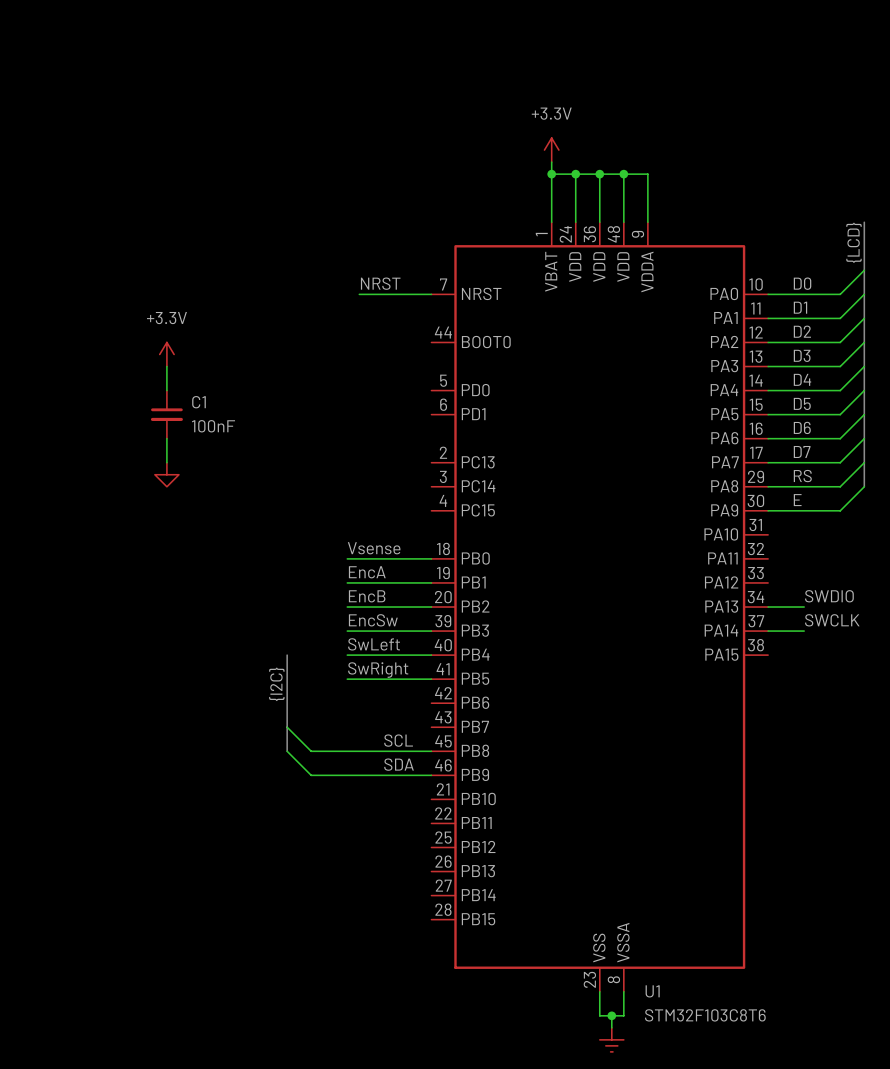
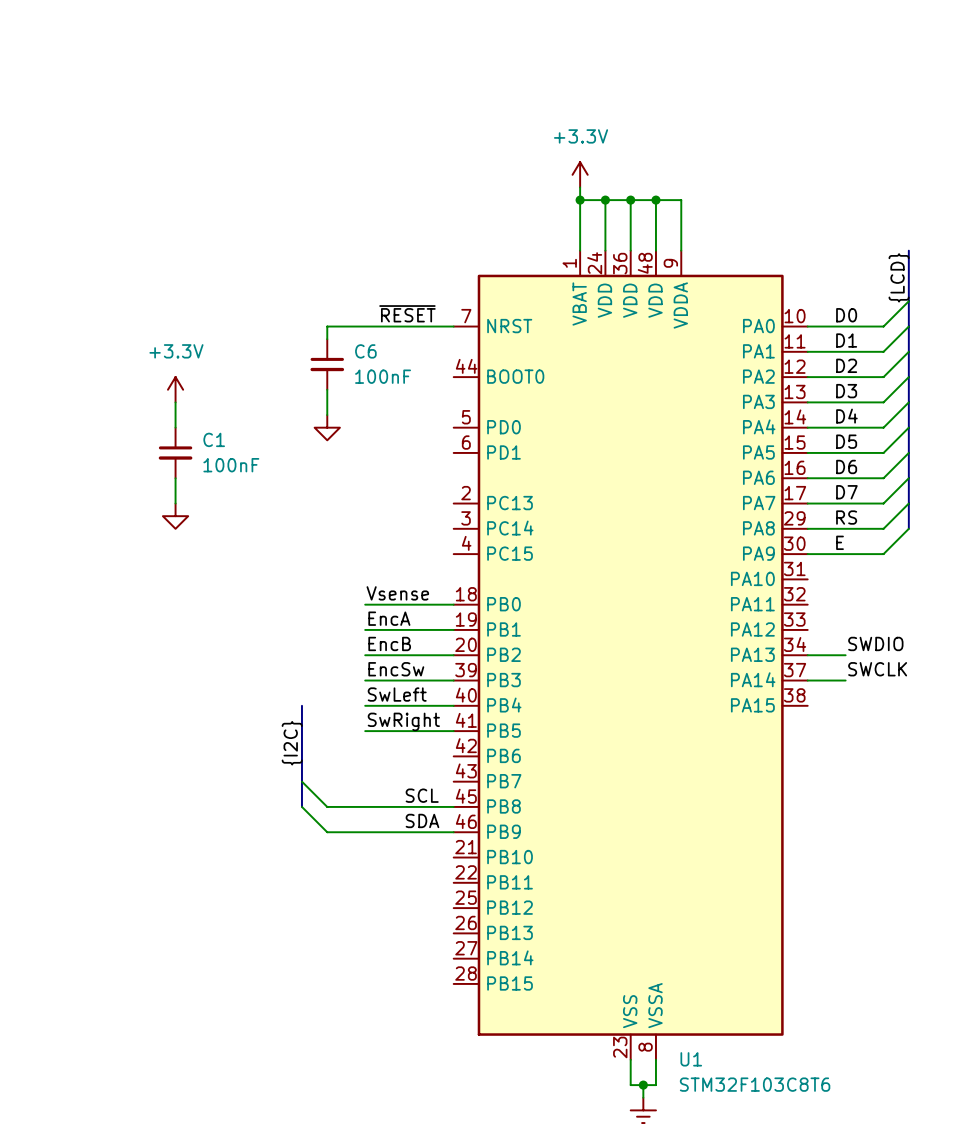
label: NRST (380, 283) -> ~{RESET} (407, 313)
wire: none -> (377, 326) (327, 326) (327, 339)
C6: none -> 100nF (327, 364)
wire: none -> (327, 389) (327, 415)
power symbol: none -> (327, 427)

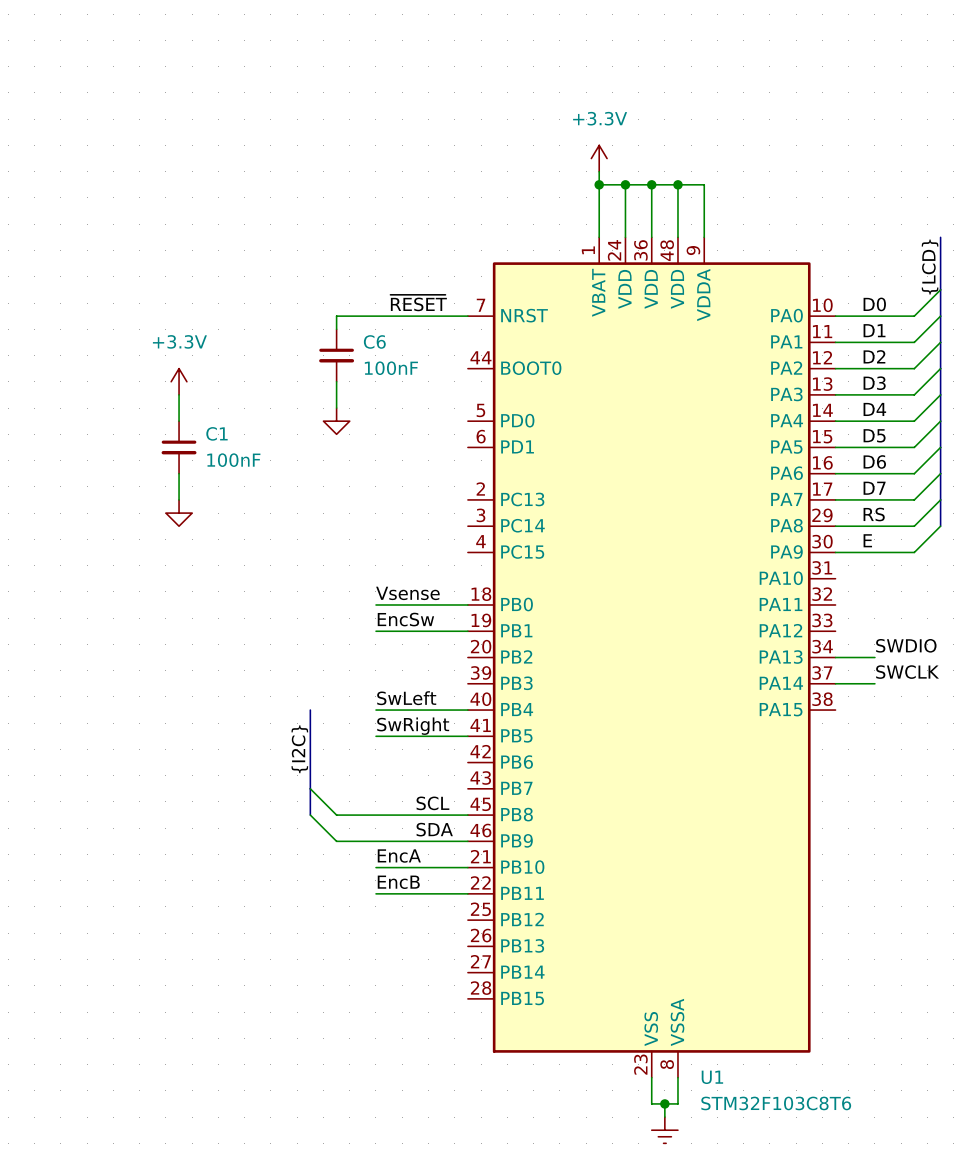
label: EncA (389, 618) -> EncSw (405, 619)
label position: EncB (389, 643) -> EncB (398, 882)
wire: (365, 655) (453, 655) -> (375, 893) (467, 893)
label: EncSw (396, 669) -> none
wire: (365, 680) (453, 680) -> (375, 867) (467, 867)
label: none -> EncA (399, 856)

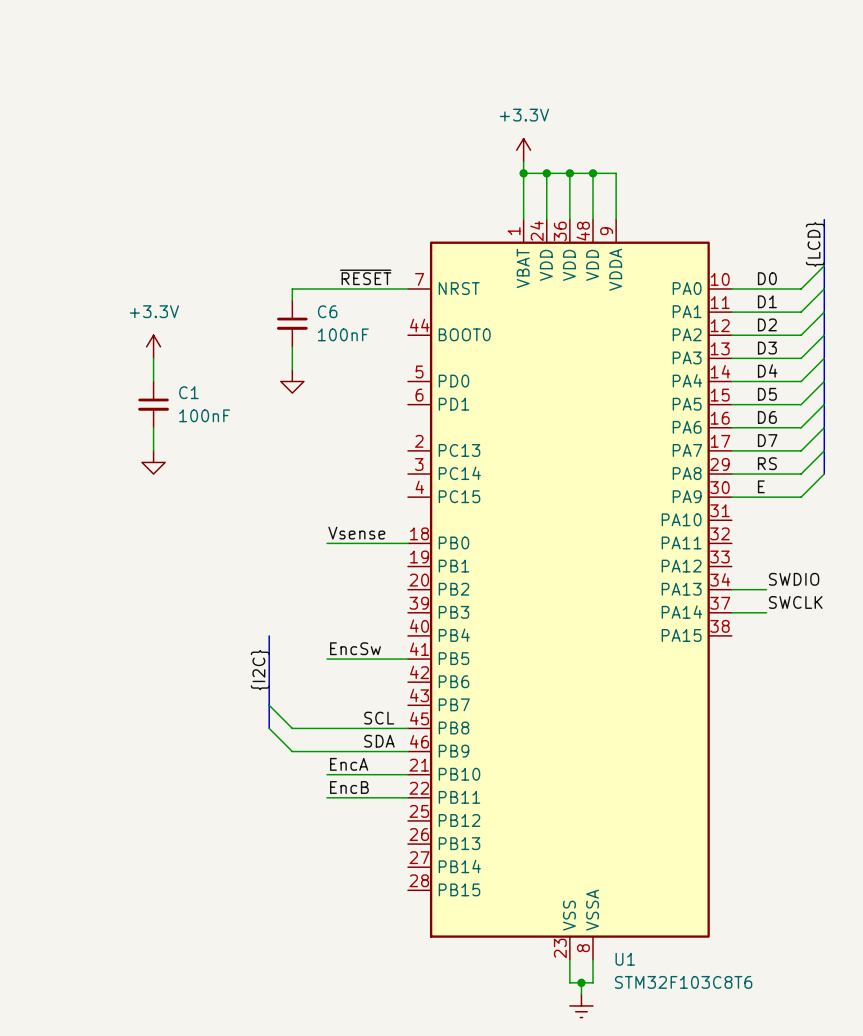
label: EncSw (405, 619) -> none
wire: (375, 631) (467, 631) -> none
label: SwLeft (406, 698) -> none
wire: (375, 710) (467, 710) -> none
label: SwRight (413, 726) -> EncSw (355, 648)

